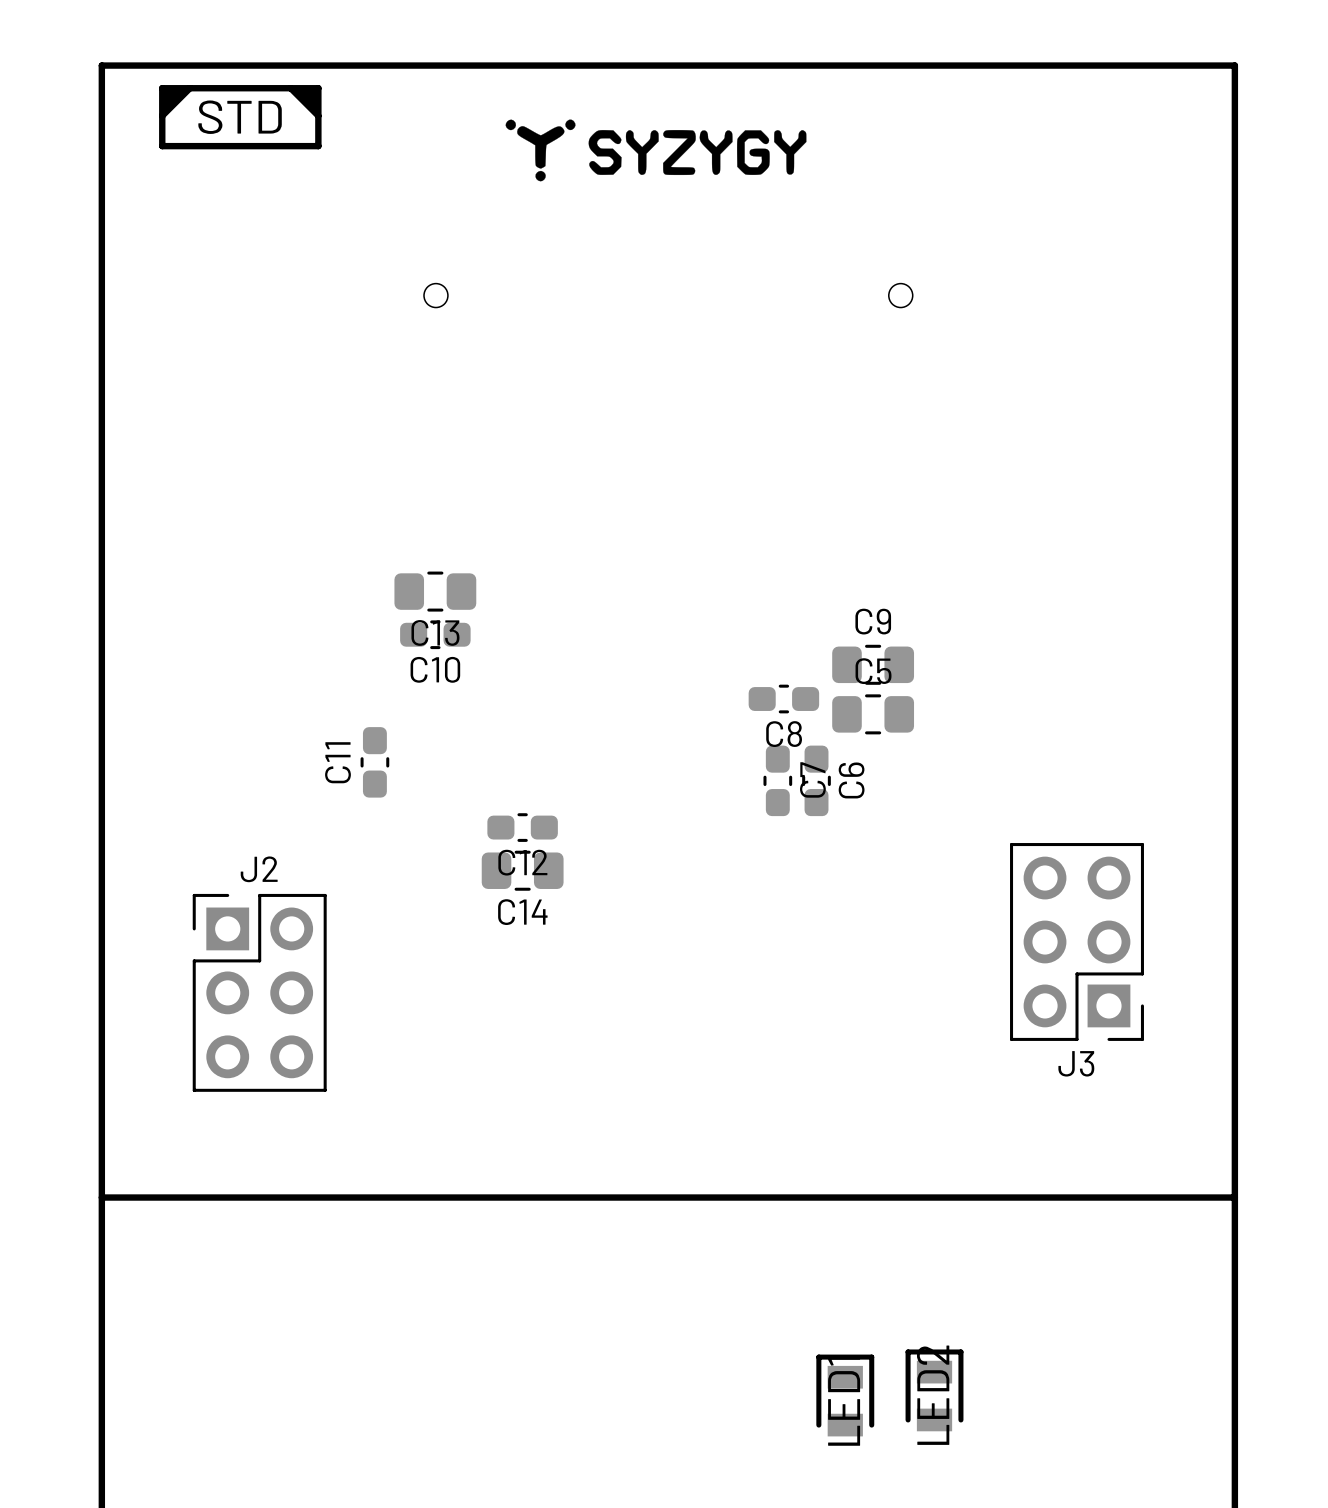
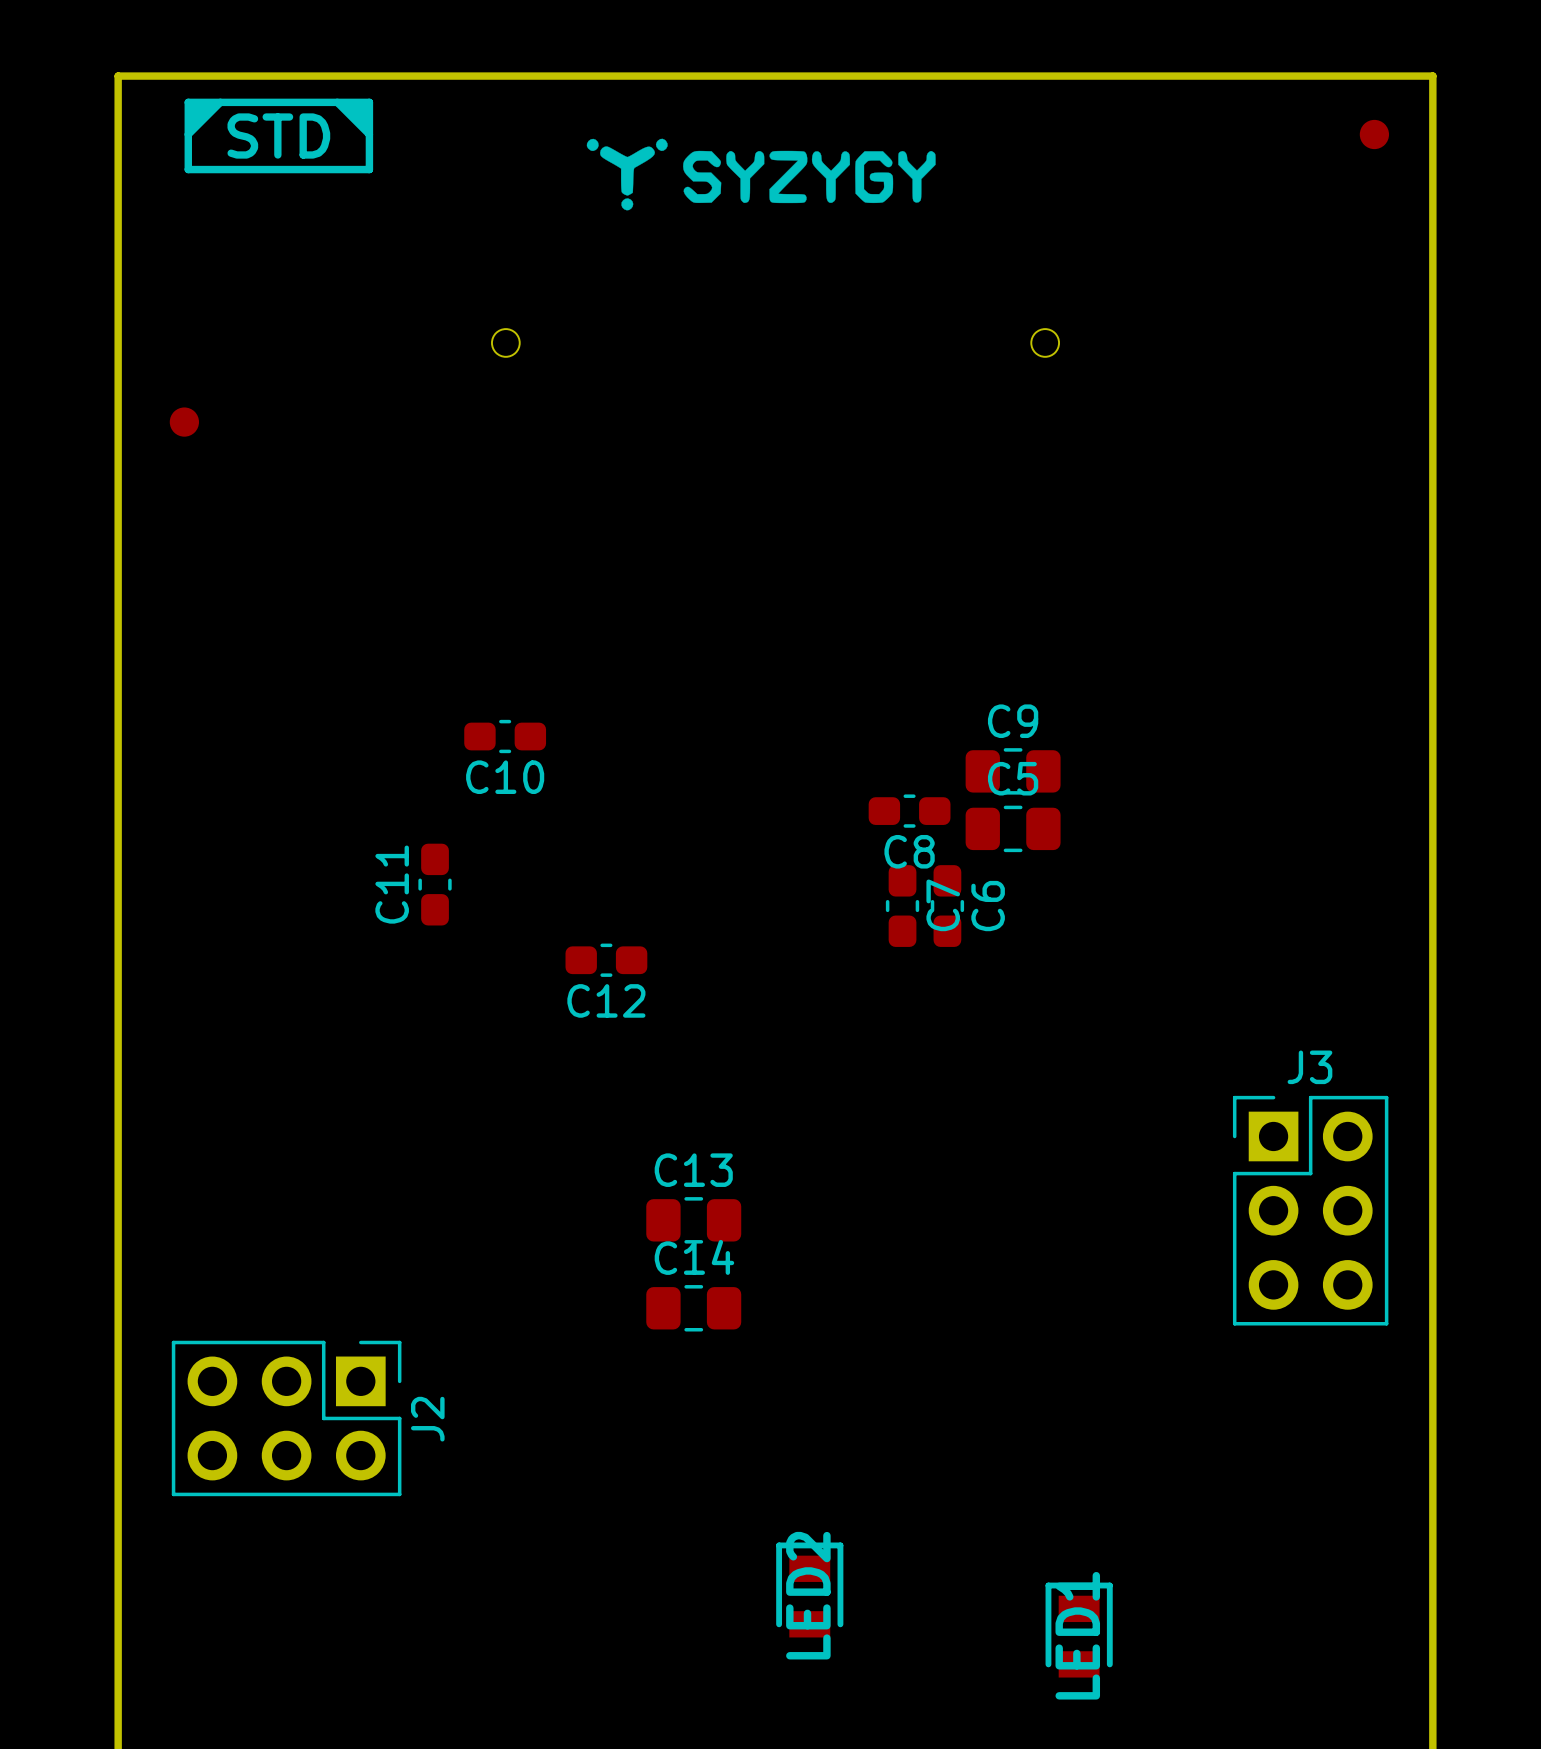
part: none -> (1374, 134)
part: none -> (184, 422)
C13 position: (435, 591) -> (693, 1220)
C13 name position: C13 (435, 632) -> C13 (693, 1170)
C14 position: (522, 870) -> (693, 1308)
C14 name position: C14 (522, 912) -> C14 (694, 1257)
J3 rotation: 0° (1077, 941) -> 180° (1310, 1210)
J2 rotation: 0° (259, 992) -> 90° clockwise (286, 1418)
J2 position: (259, 992) -> (286, 1418)
board edge: (101, 1197) (1234, 1197) -> none
LED2 position: (934, 1390) -> (809, 1589)
LED1 position: (845, 1395) -> (1079, 1630)

